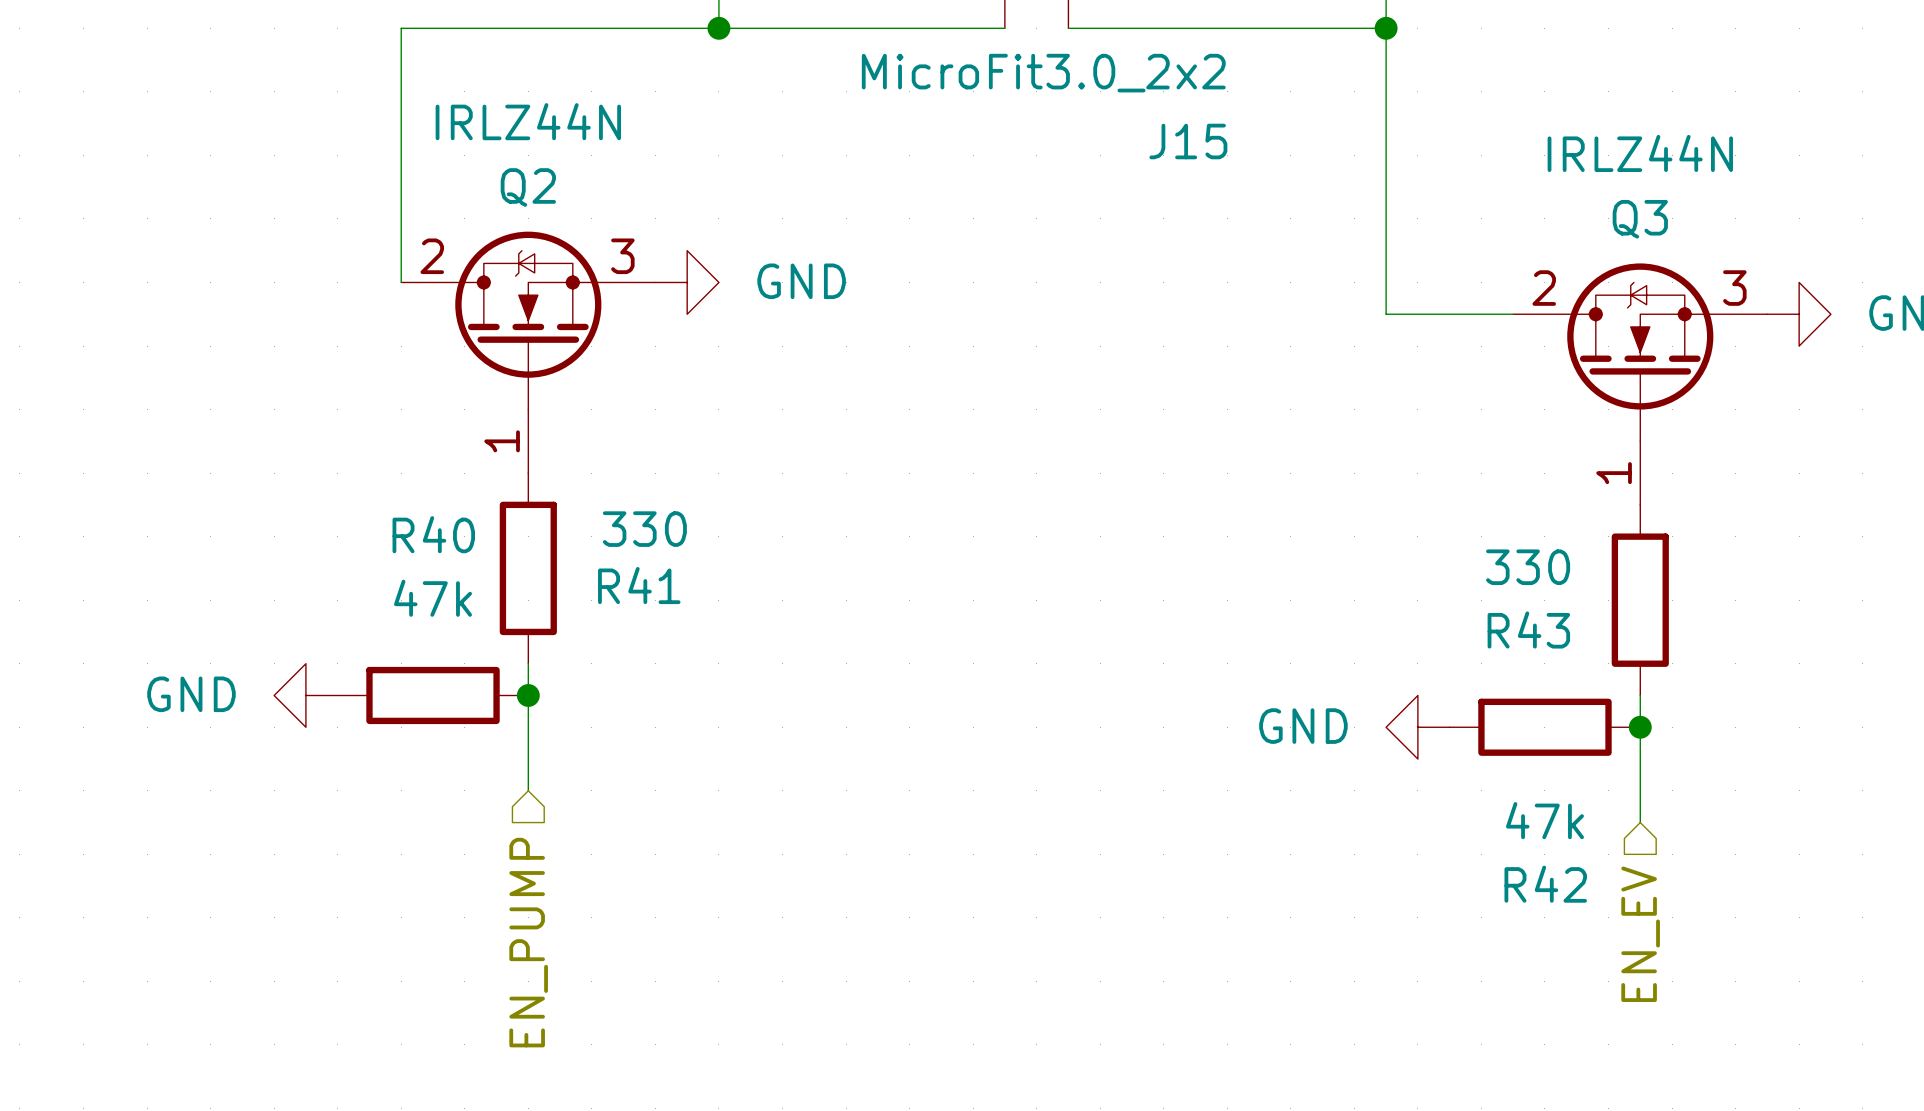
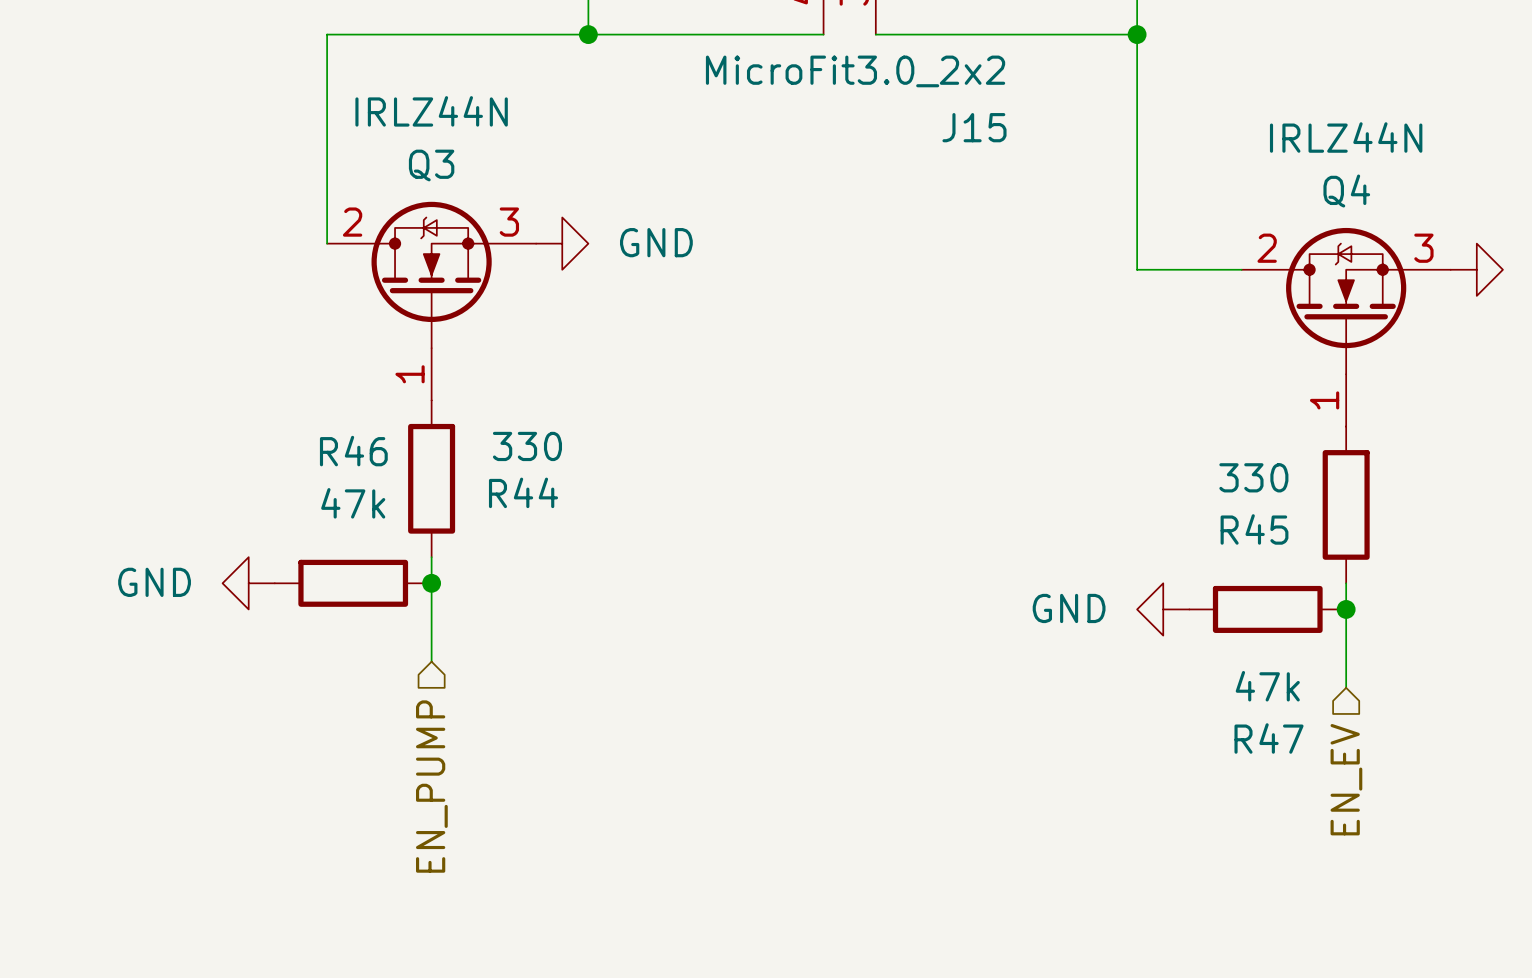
Q2 name: Q2 (528, 187) -> Q3 (431, 165)
Q3 name: Q3 (1640, 219) -> Q4 (1346, 191)
R40 name: R40 (433, 534) -> R46 (353, 451)
R41 name: R41 (639, 585) -> R44 (523, 492)
R43 name: R43 (1528, 630) -> R45 (1254, 529)
R42 name: R42 (1545, 884) -> R47 (1269, 738)

